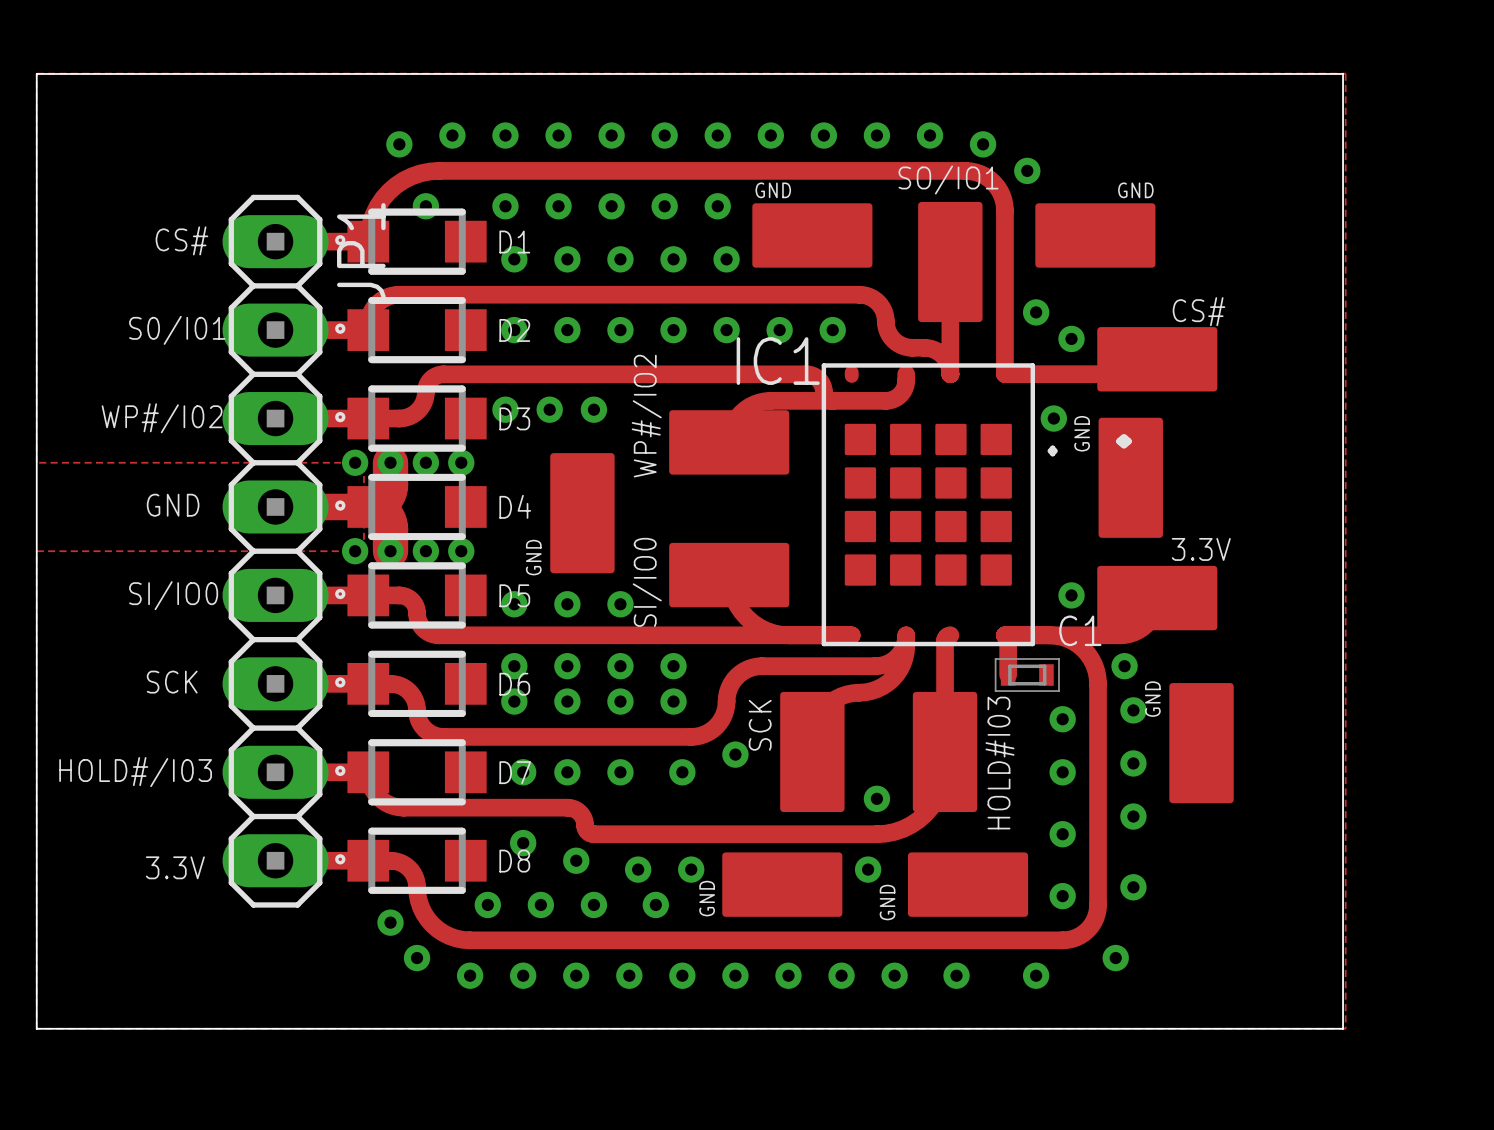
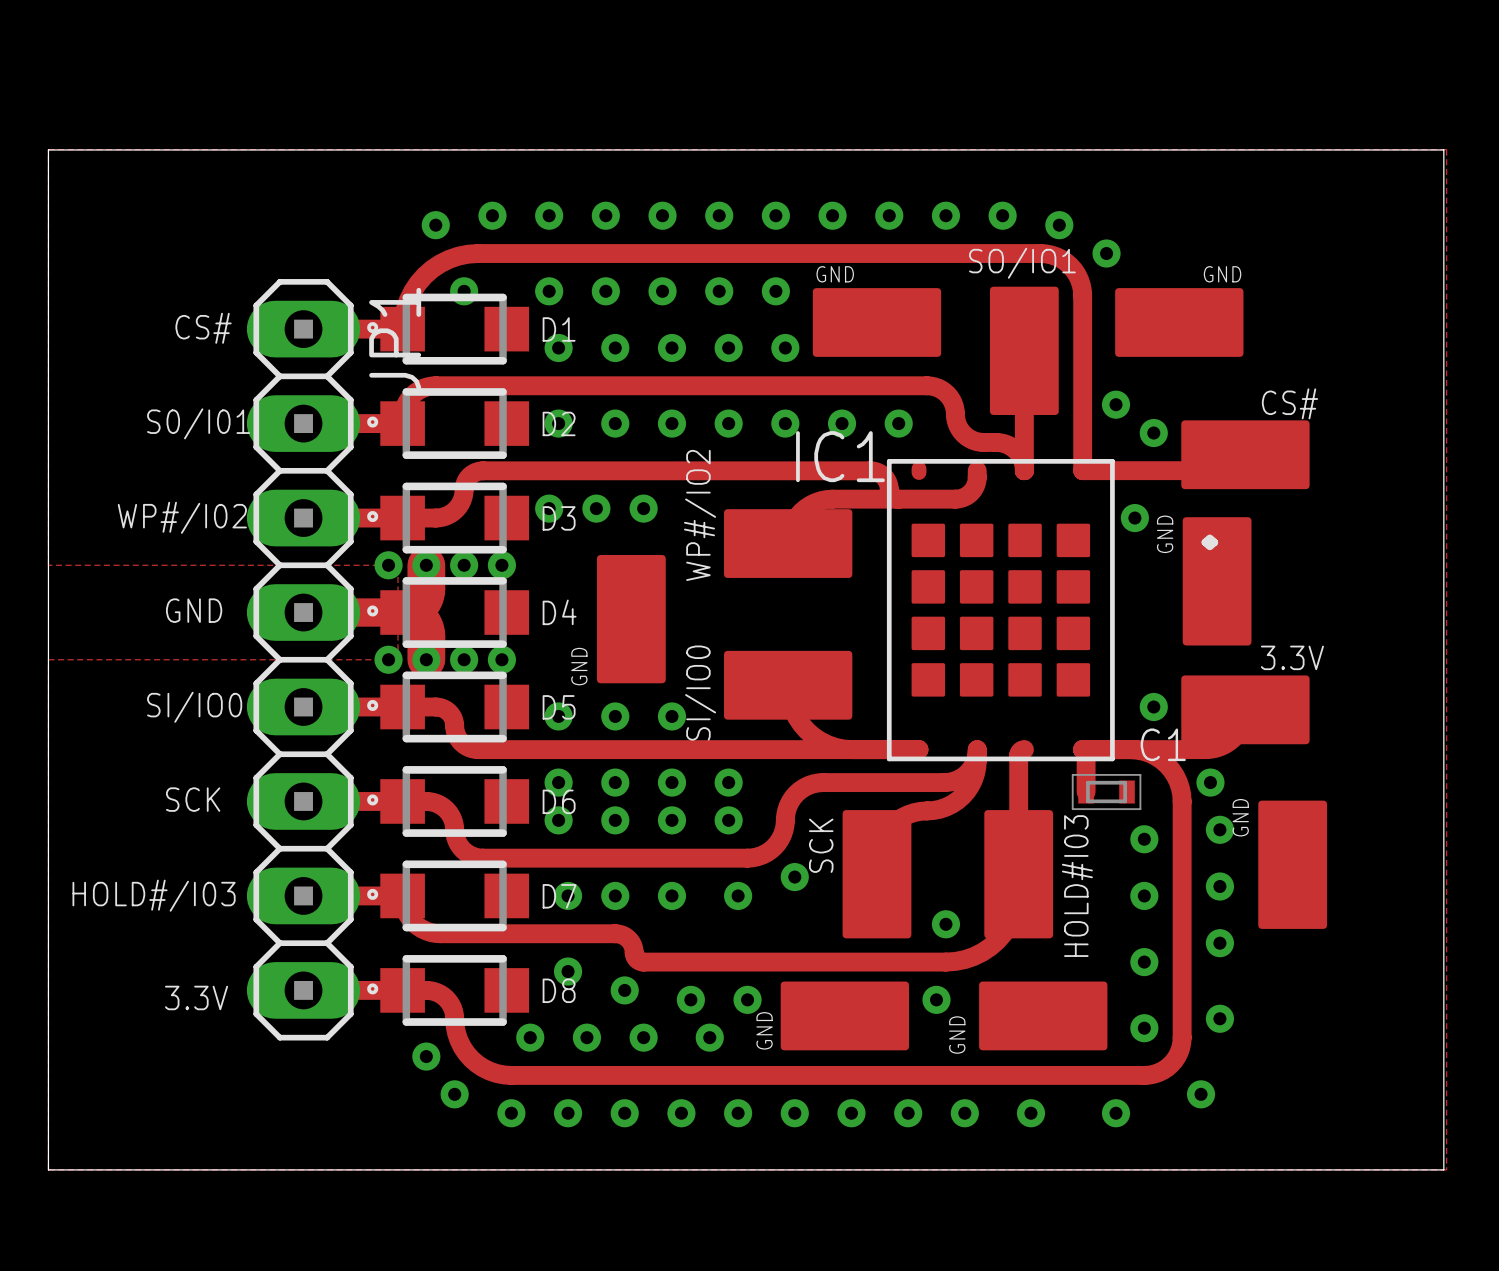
text: . (1052, 450) -> none

